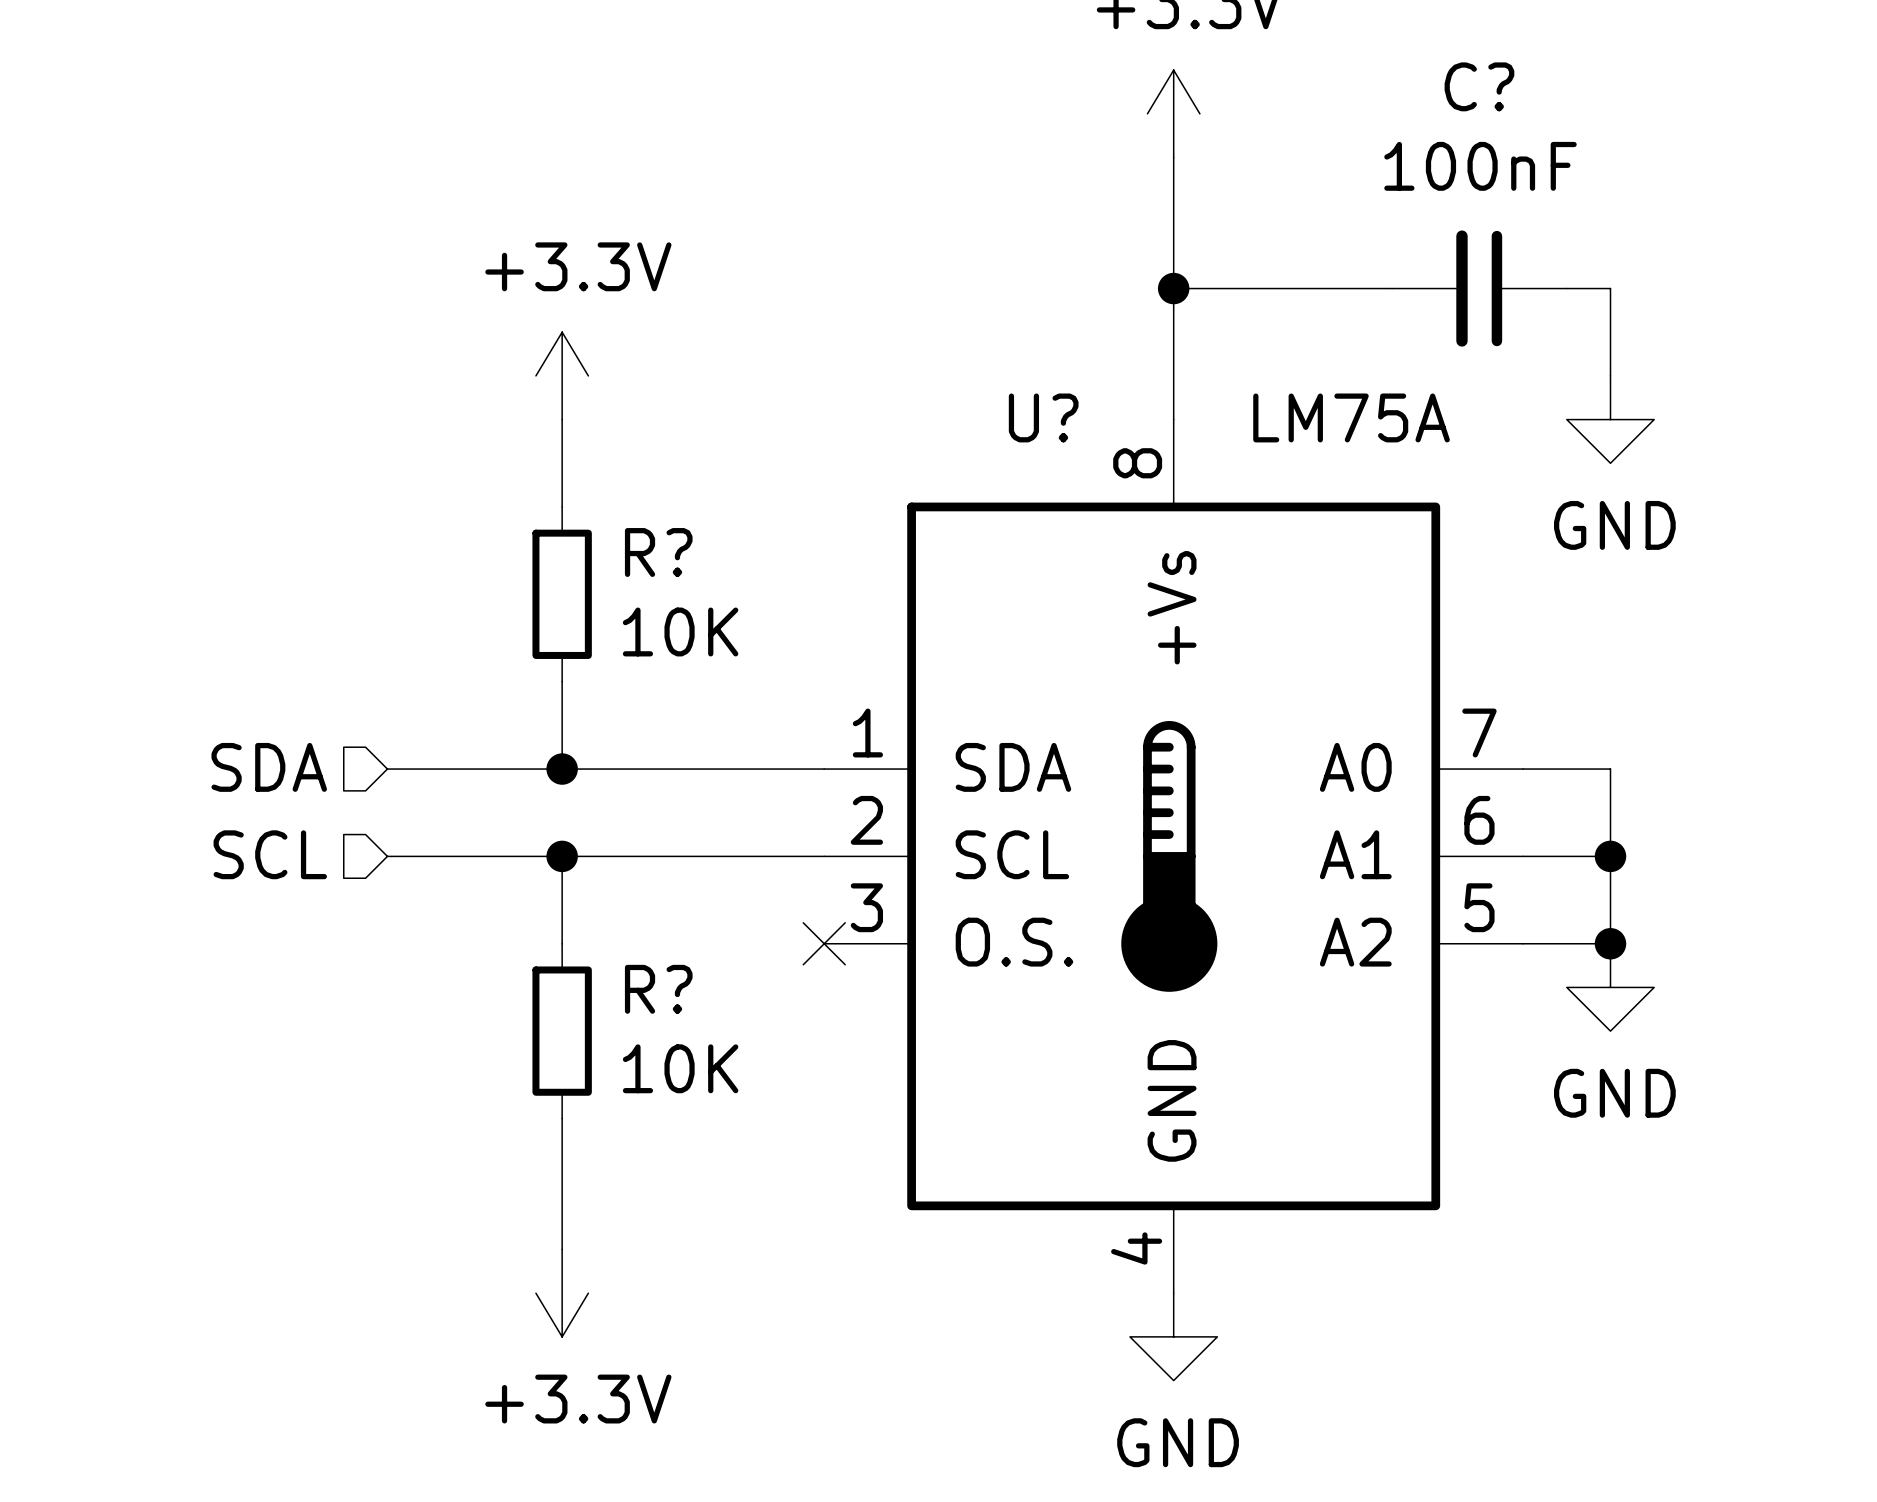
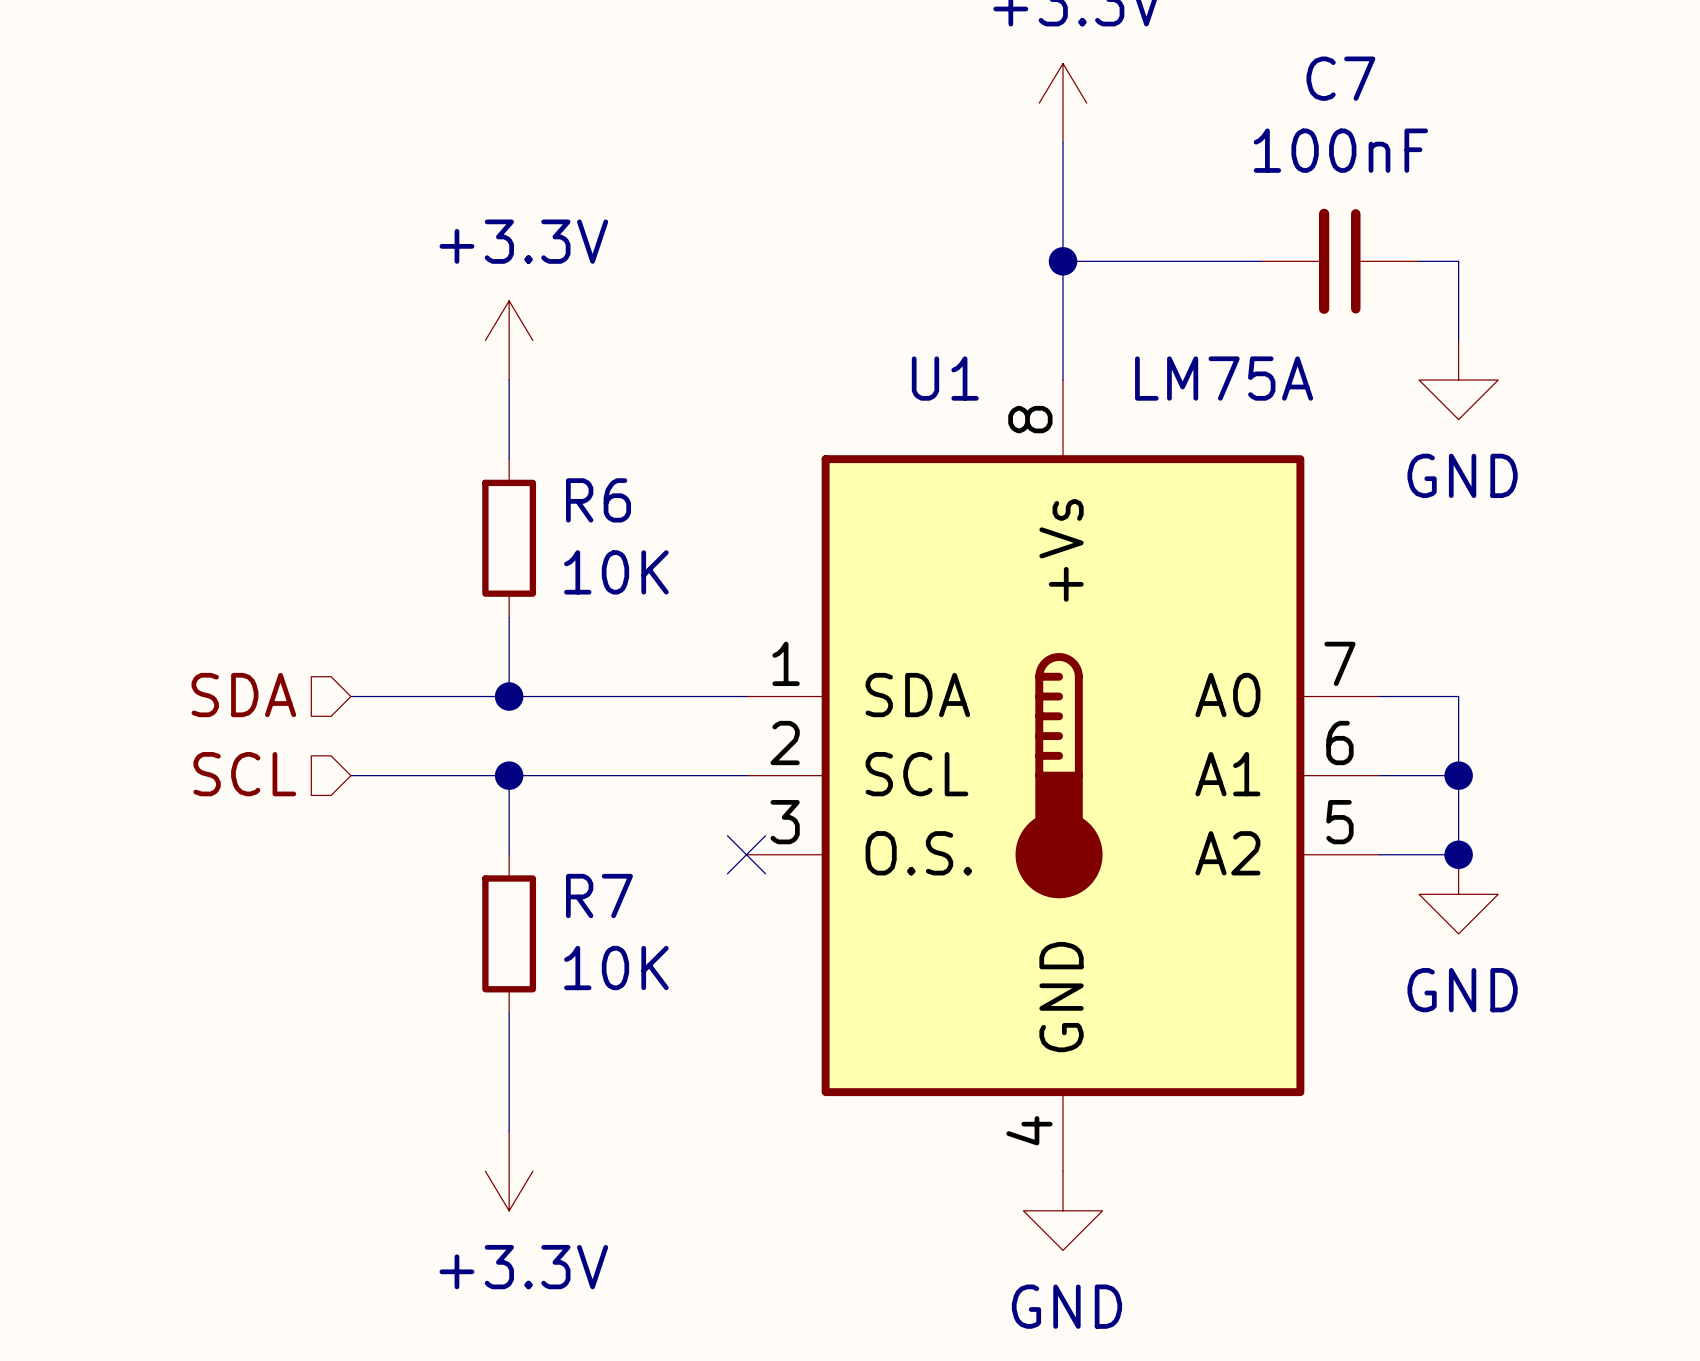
C? name: C? (1479, 86) -> C7 (1340, 78)
U? name: U? (1043, 417) -> U1 (945, 378)
R? name: R? (658, 552) -> R6 (598, 500)
R? name: R? (658, 989) -> R7 (599, 896)

